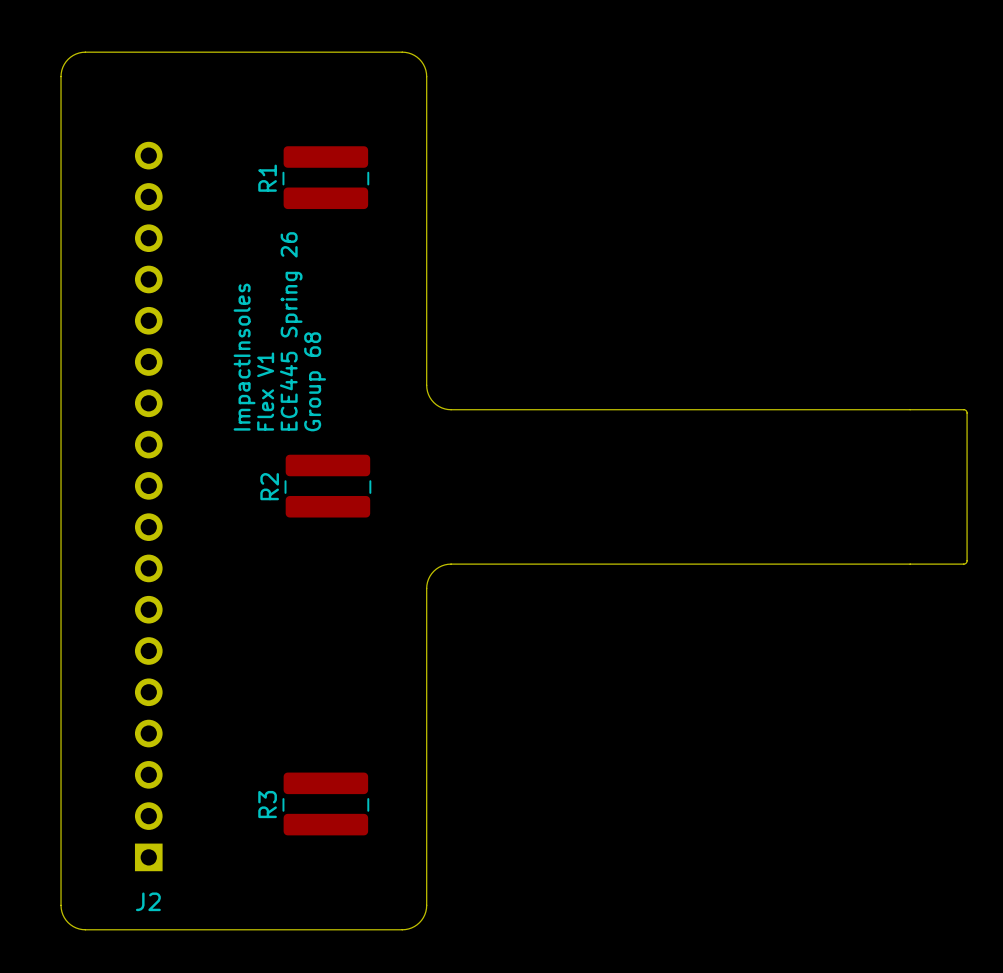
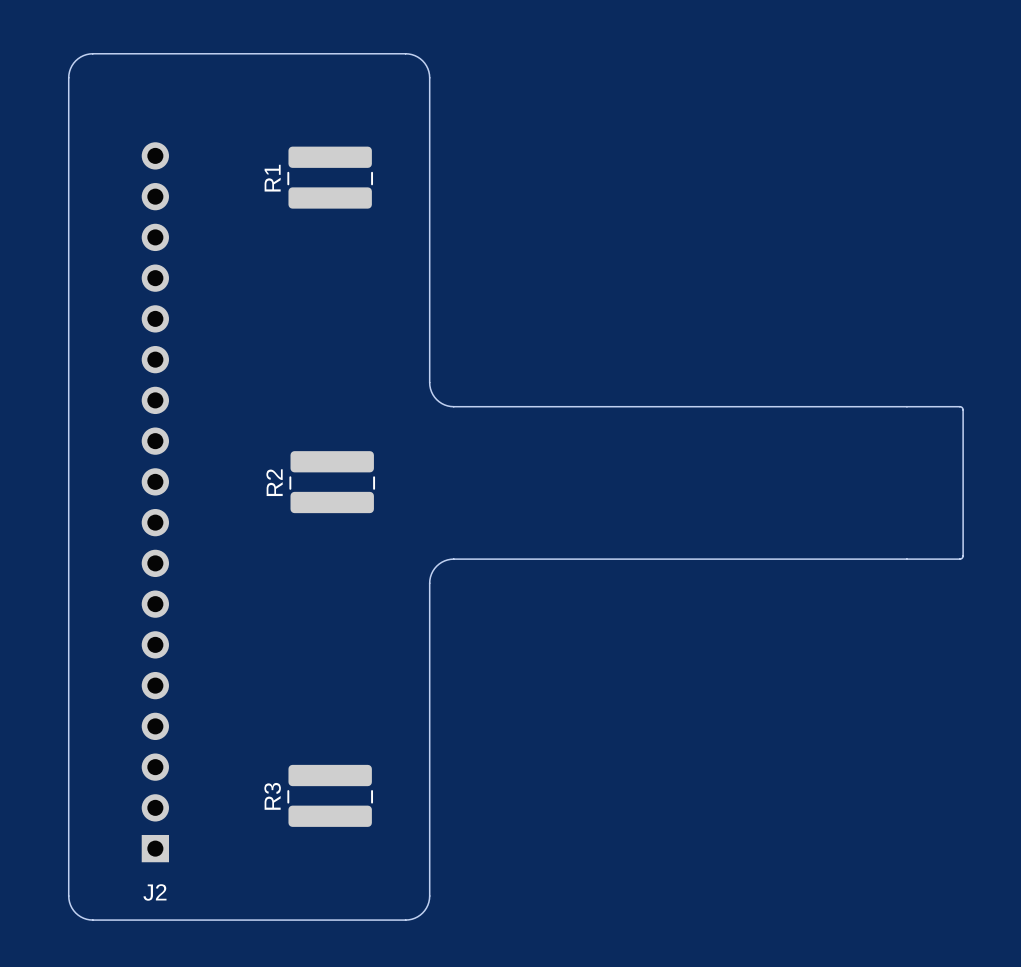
text: ECE445 Spring 26 (291, 331) -> none
text: ImpactInsoles (244, 357) -> none
text: Group 68 (315, 381) -> none
text: Flex V1 (265, 391) -> none

